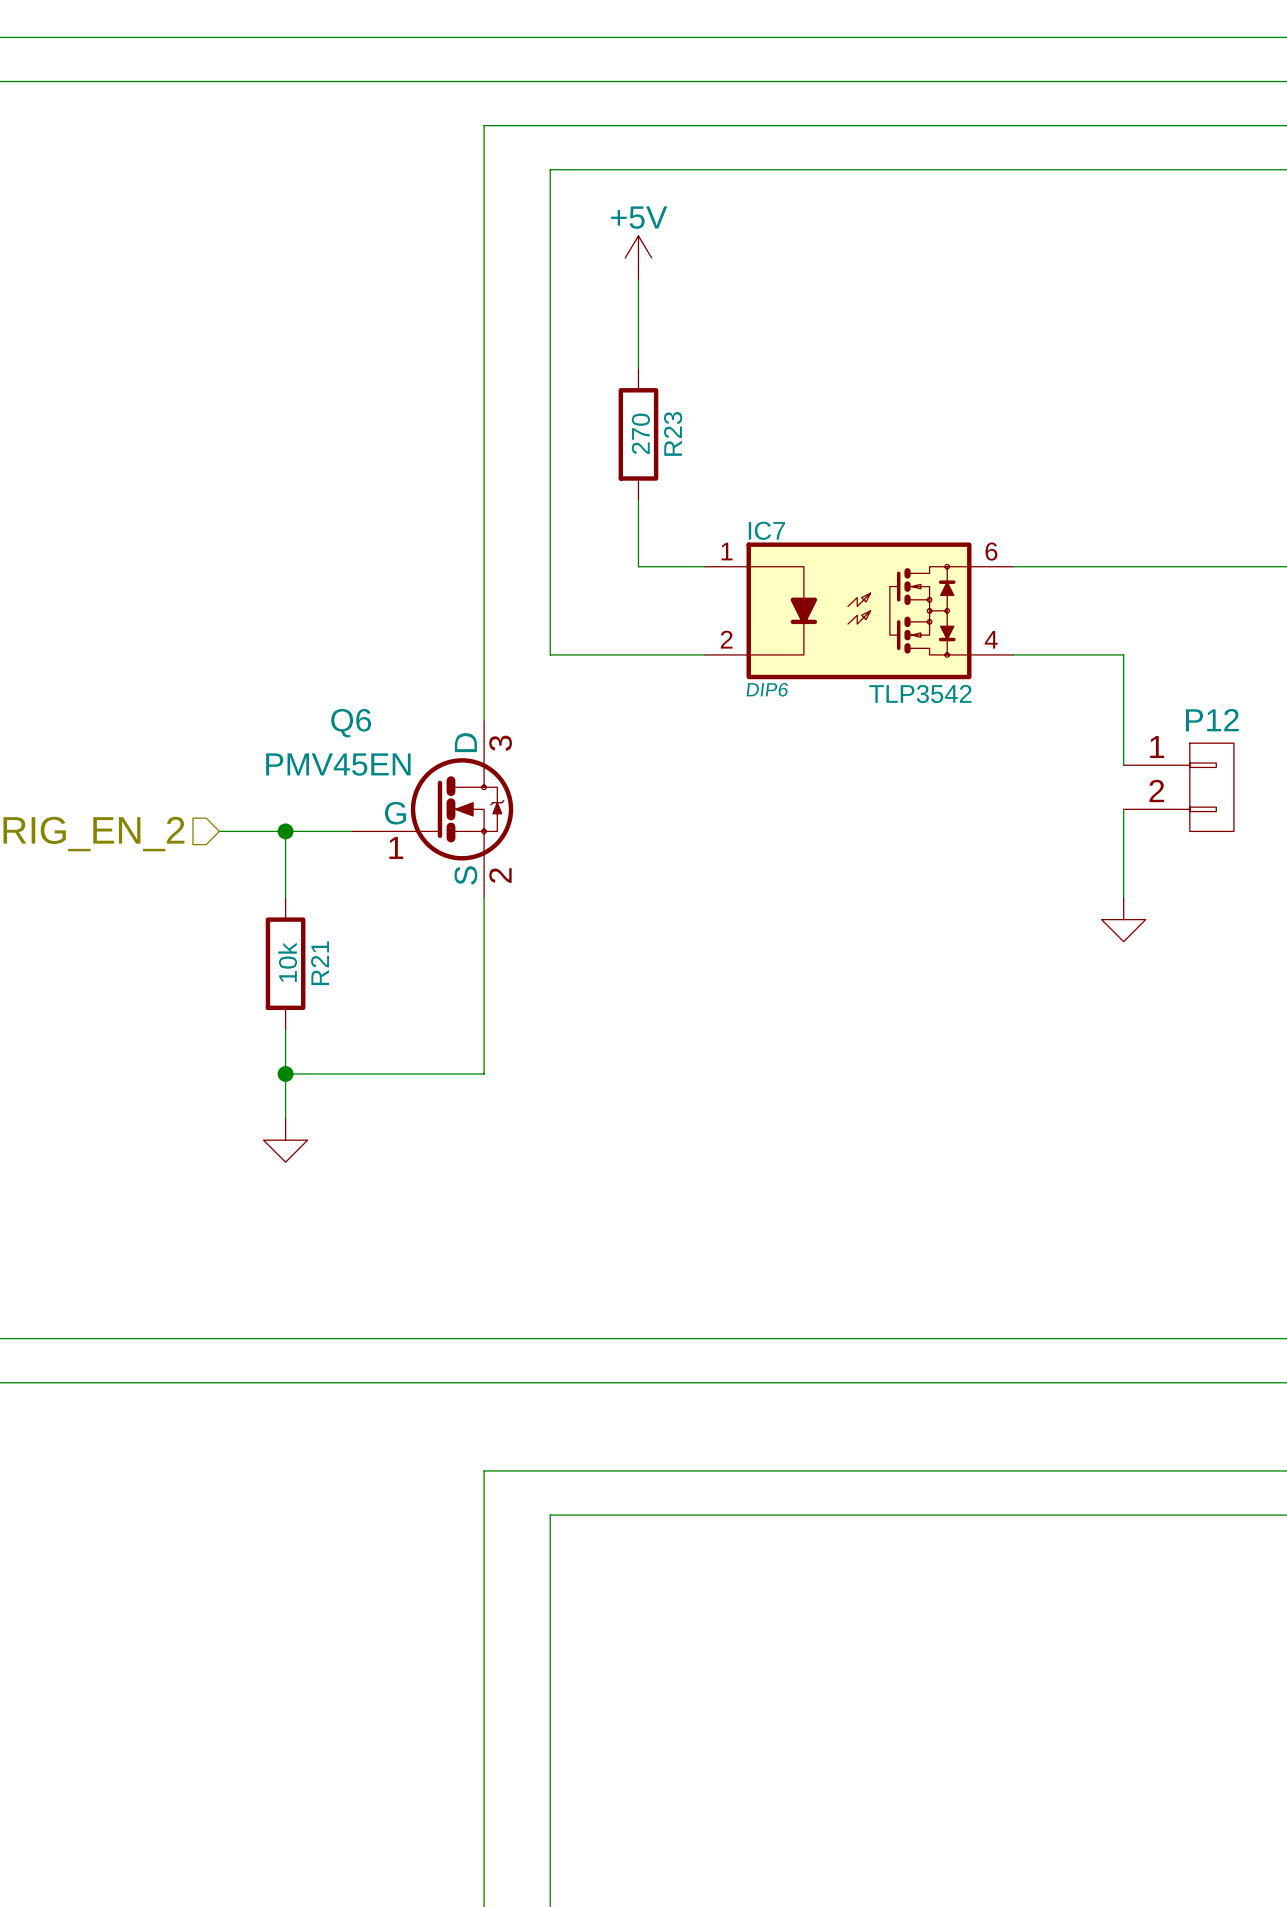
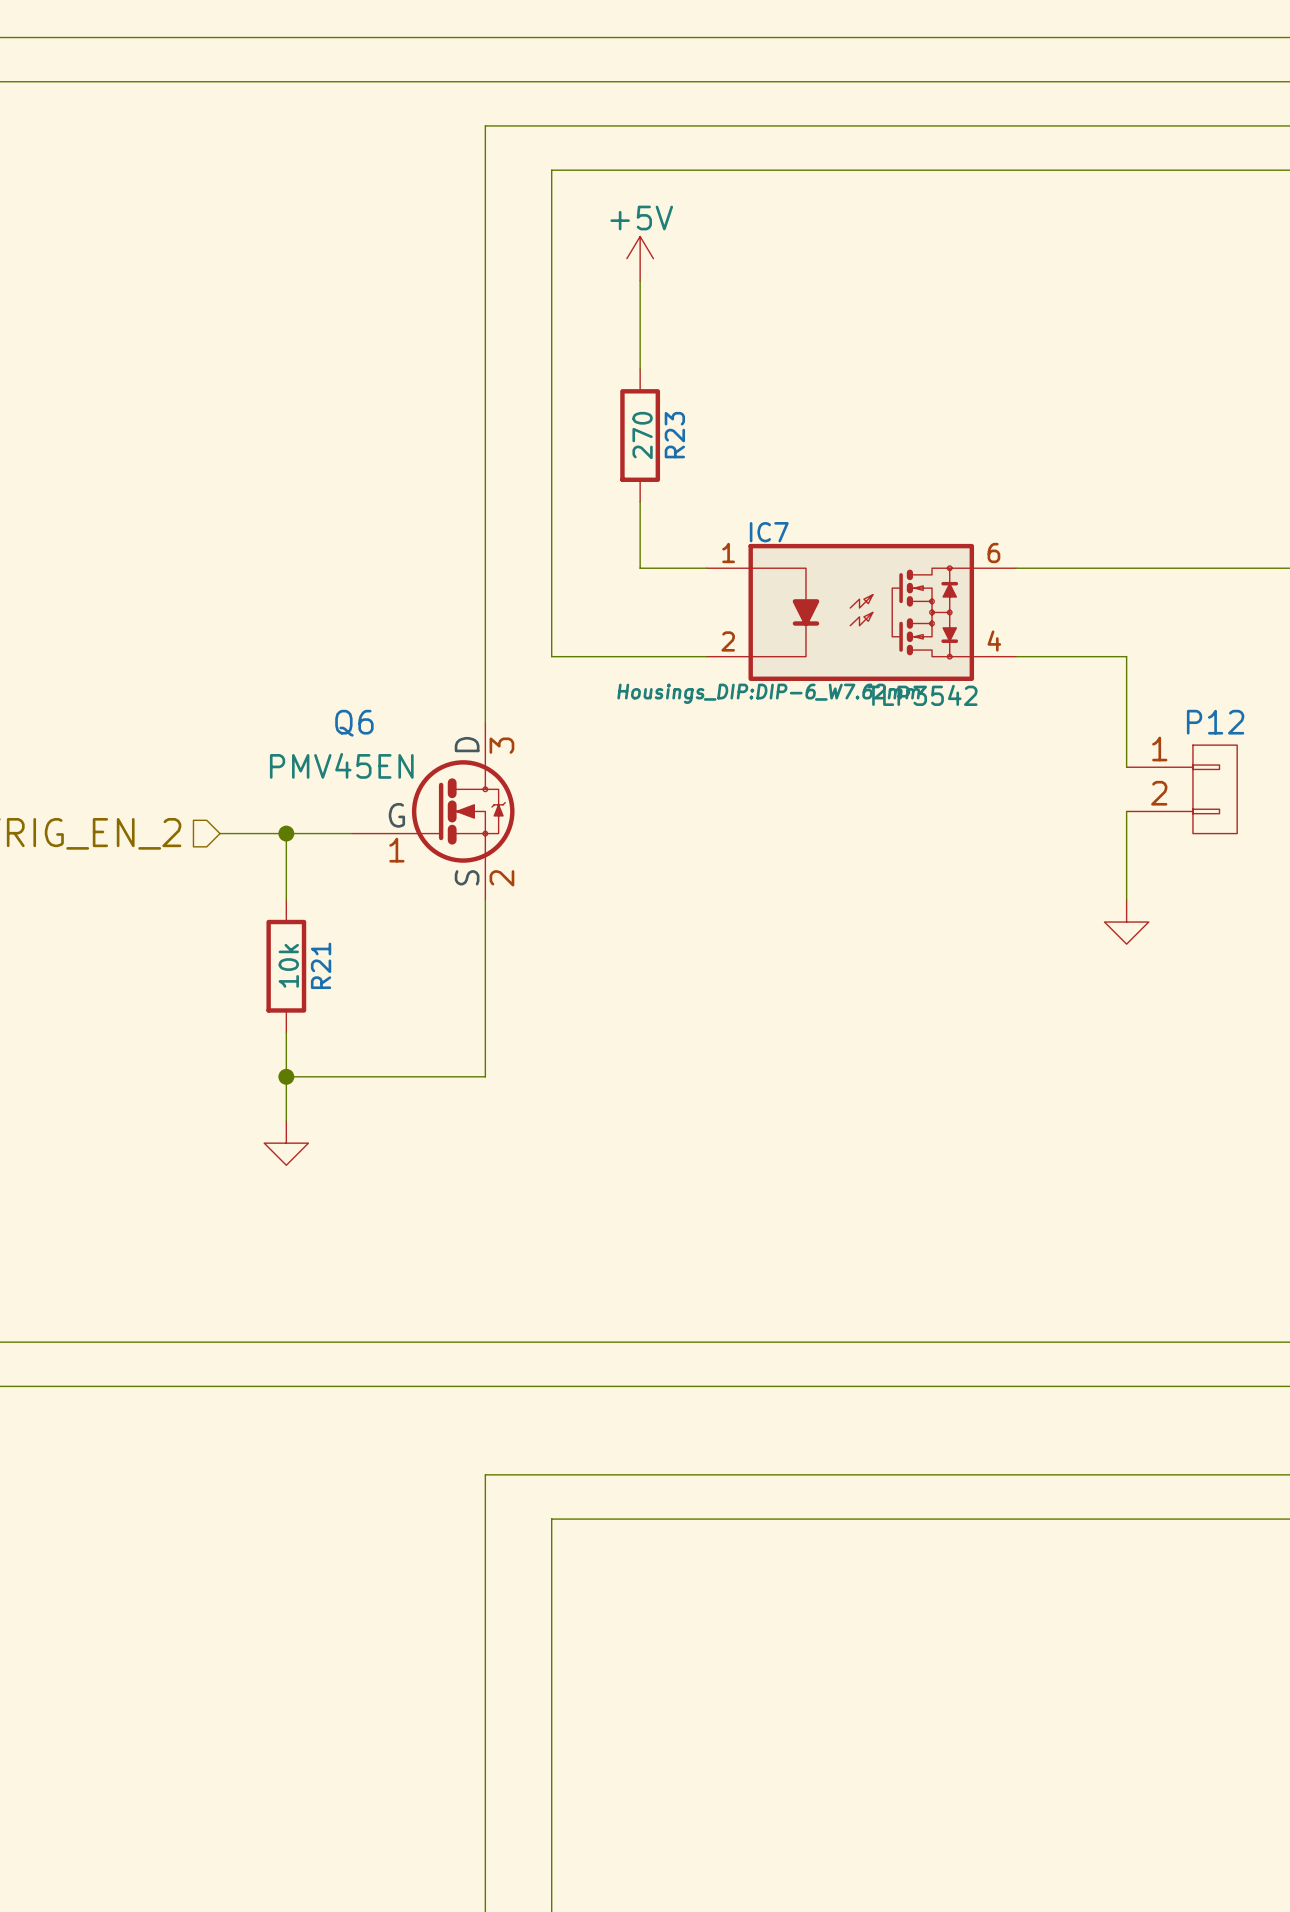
IC7 text: DIP6 (767, 689) -> Housings_DIP:DIP-6_W7.62mm (768, 693)

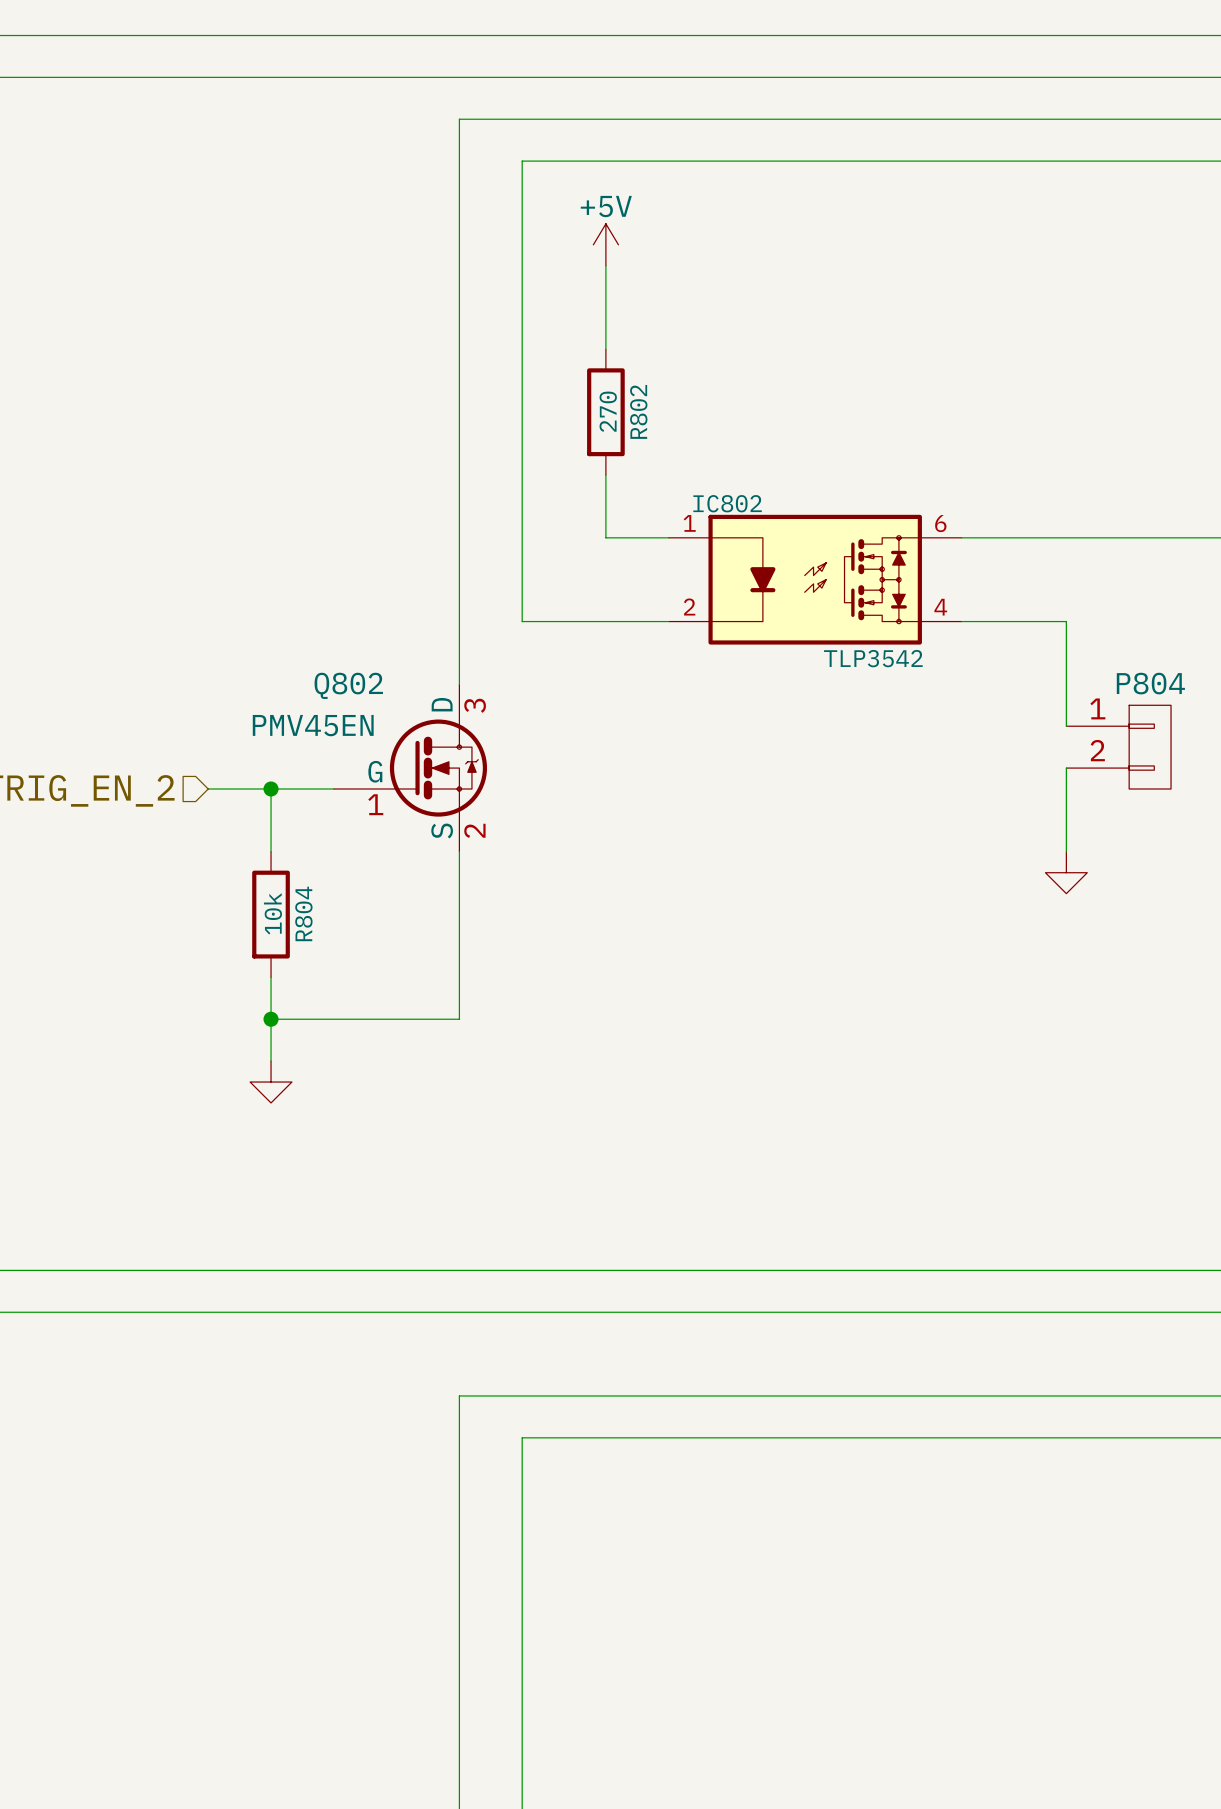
R23 name: R23 (674, 435) -> R802 (638, 411)
IC7 name: IC7 (769, 532) -> IC802 (727, 503)
IC7 text: Housings_DIP:DIP-6_W7.62mm (768, 693) -> none
P12 name: P12 (1215, 722) -> P804 (1150, 683)
Q6 name: Q6 (354, 723) -> Q802 (348, 685)
R21 name: R21 (321, 965) -> R804 (303, 913)

